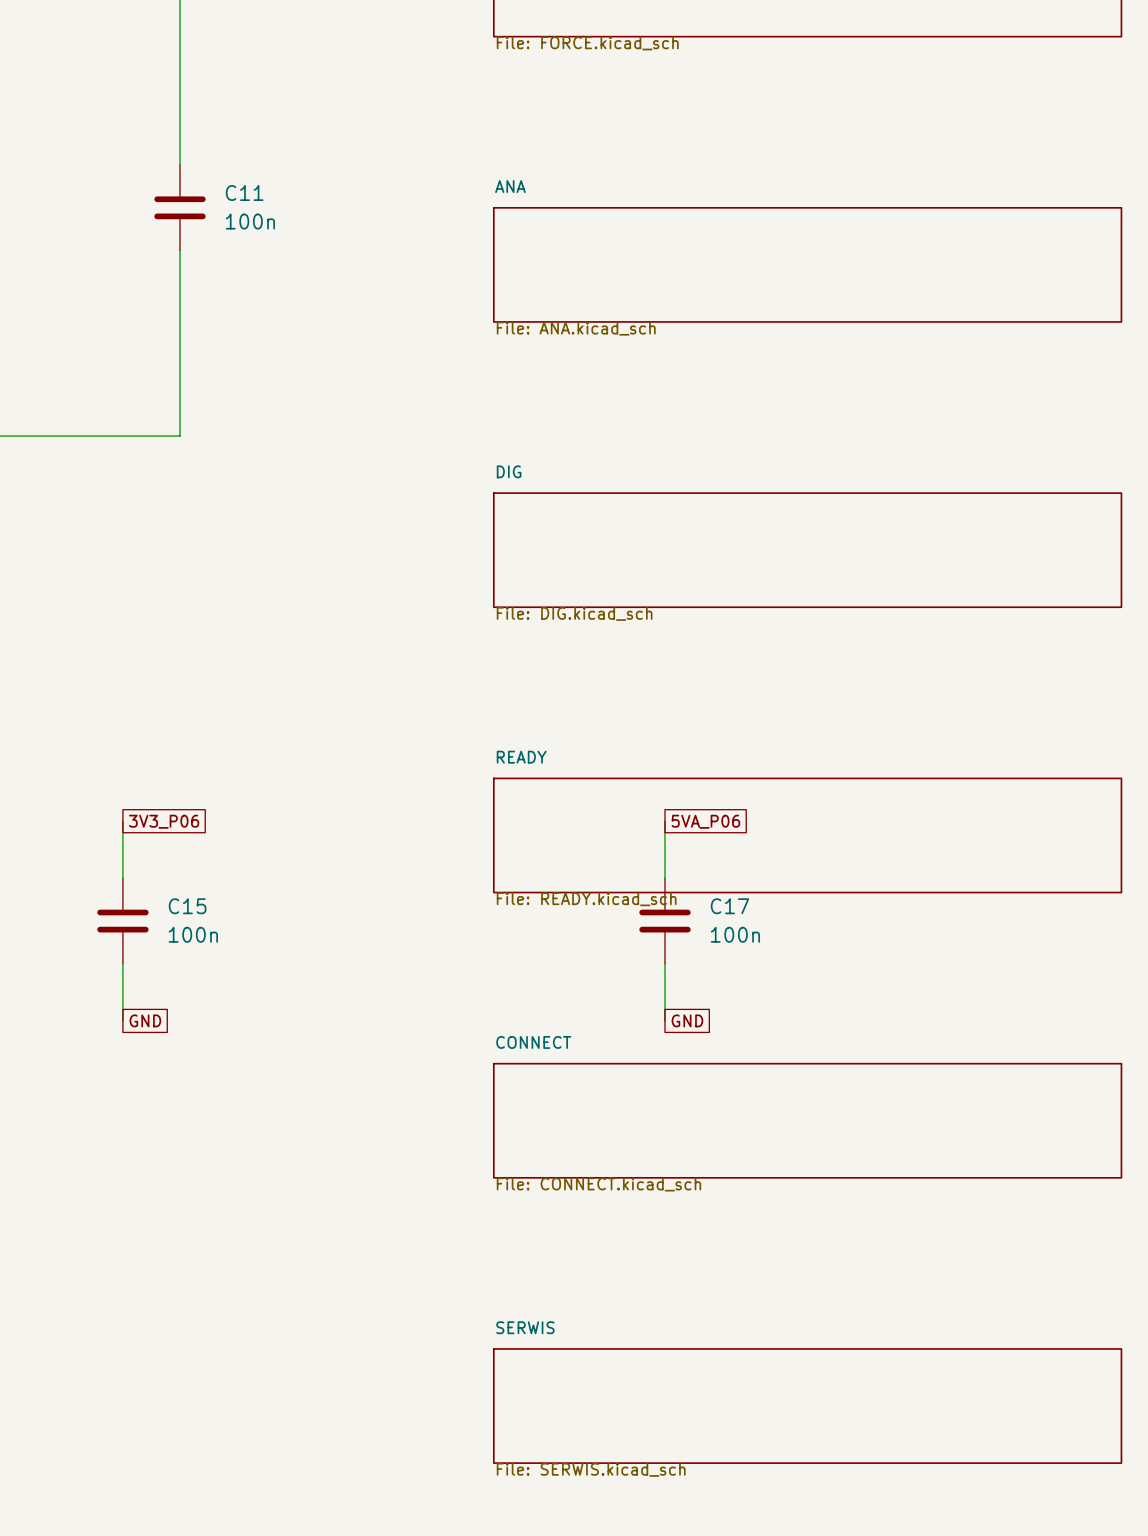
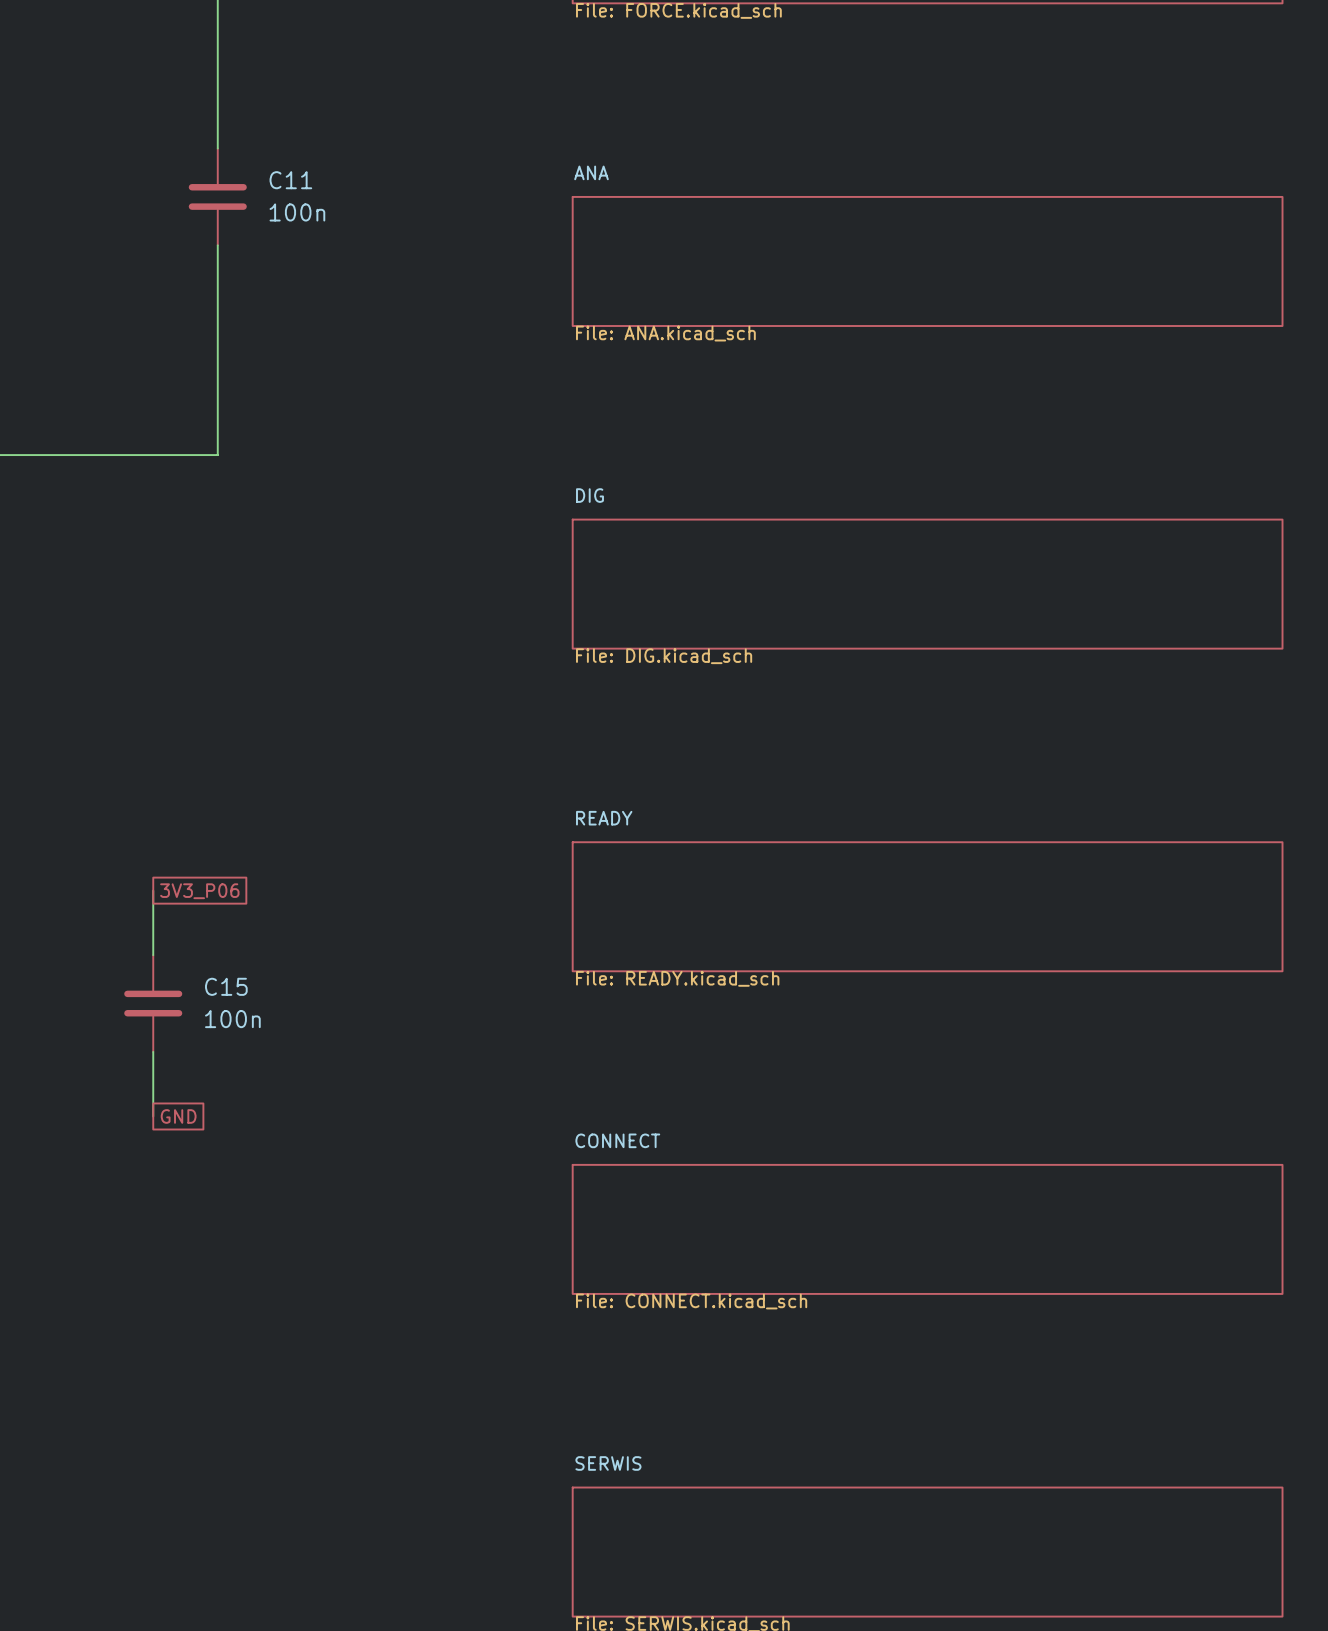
wire: (664, 821) (664, 878) -> none
global label: 5VA_P06 (705, 821) -> none
C17: 100n (664, 921) -> none
wire: (664, 963) (664, 1020) -> none
global label: GND (687, 1020) -> none

